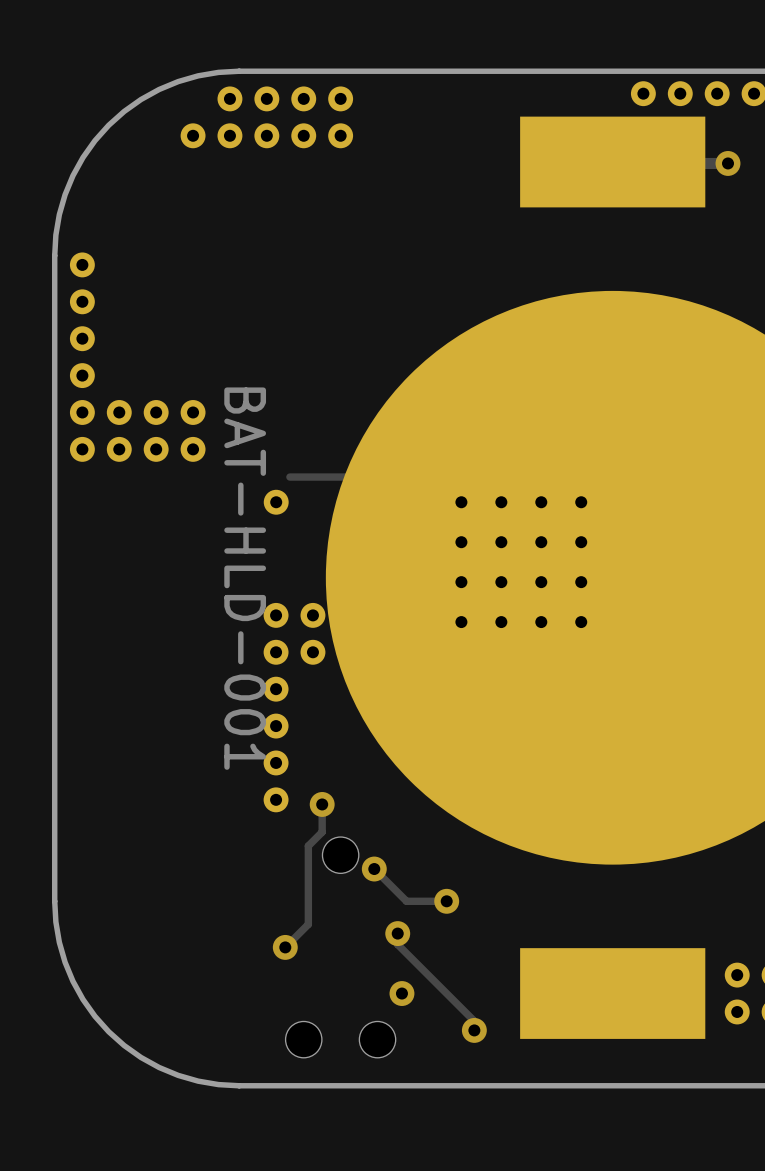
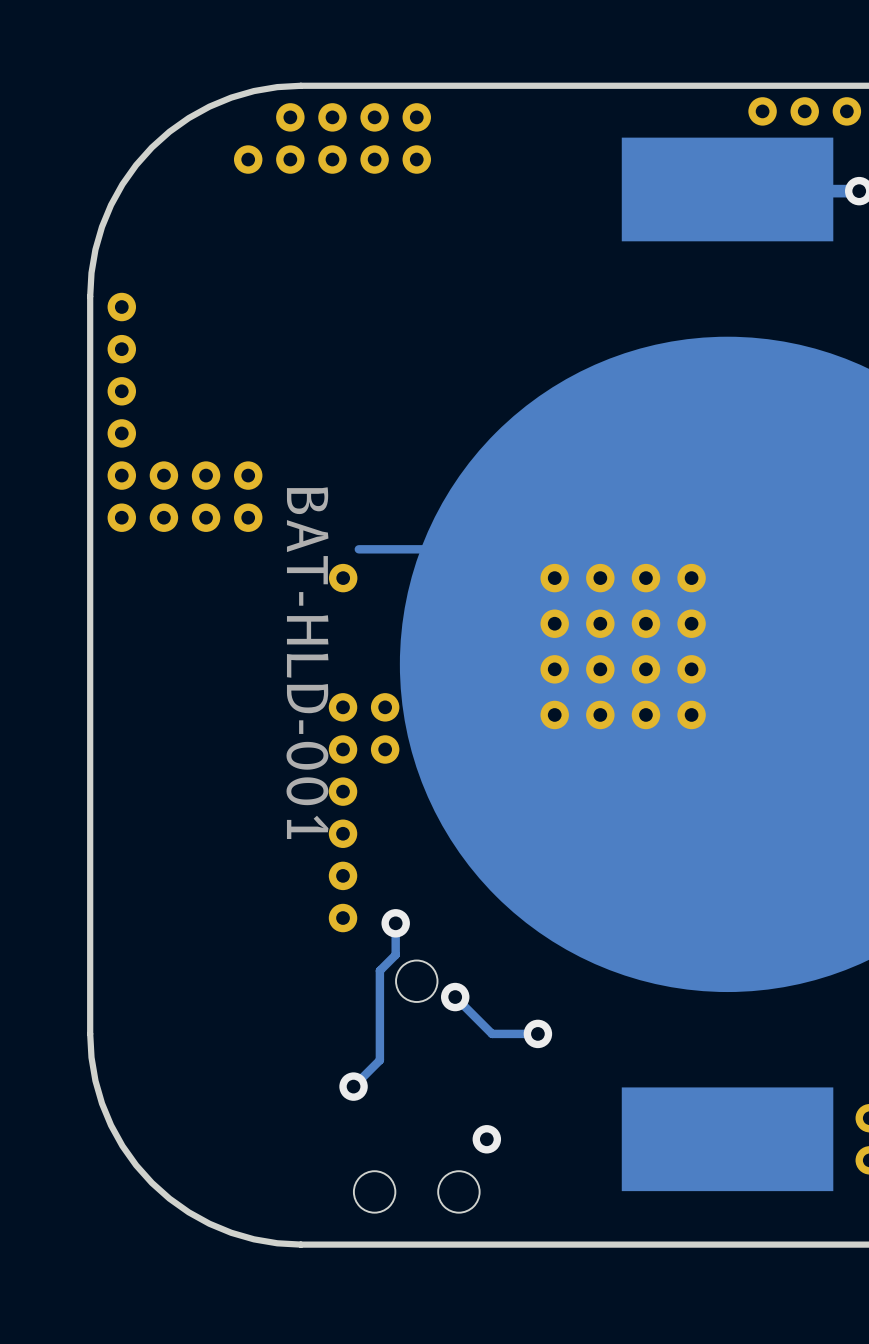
track: (397, 933) (397, 944) (474, 1021) (474, 1030) -> none
via: (397, 933) -> none
via: (474, 1030) -> none

